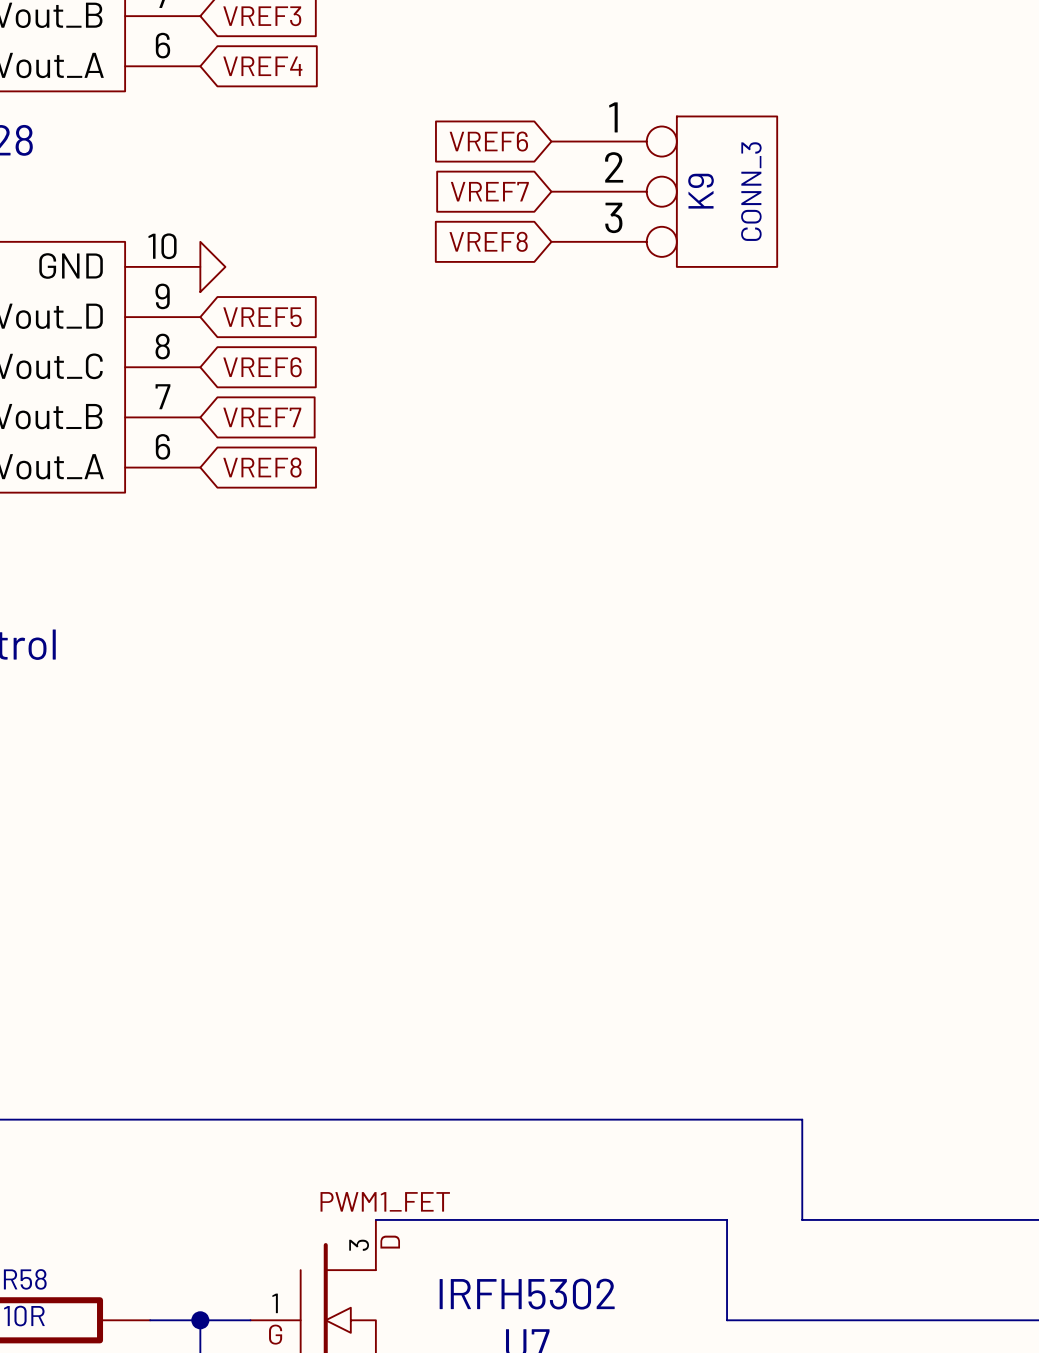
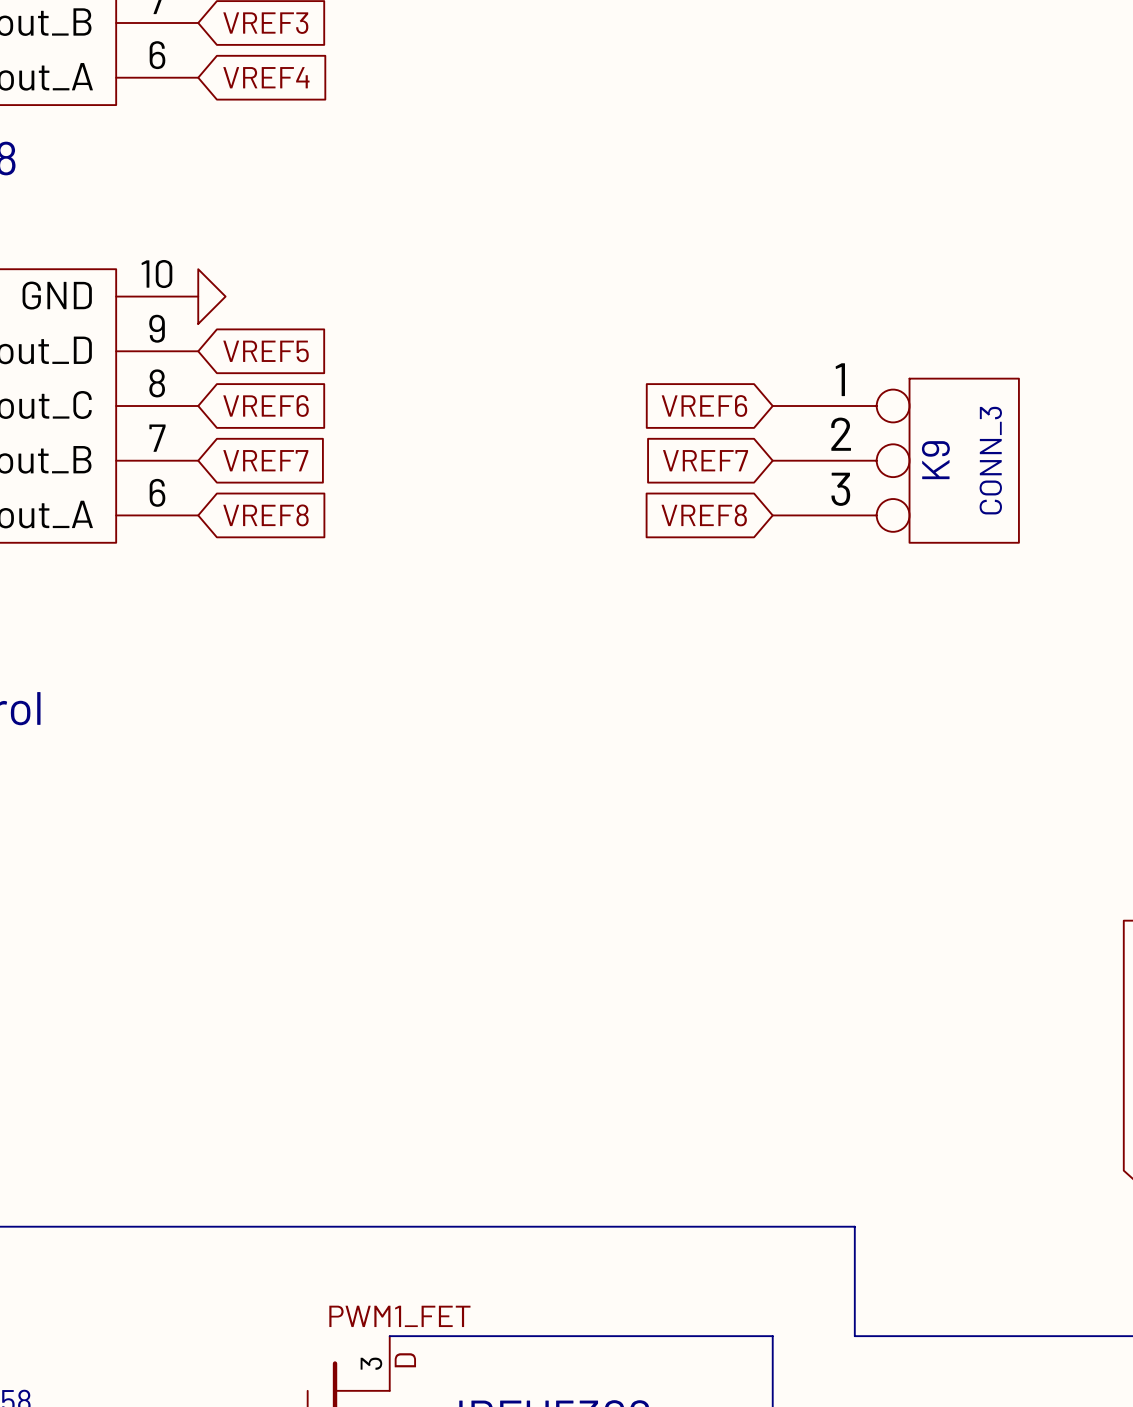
global label position: VREF6 (488, 141) -> VREF6 (704, 405)
global label position: VREF7 (489, 191) -> VREF7 (705, 460)
K9 position: (664, 191) -> (895, 460)
global label position: VREF8 (488, 241) -> VREF8 (704, 515)

